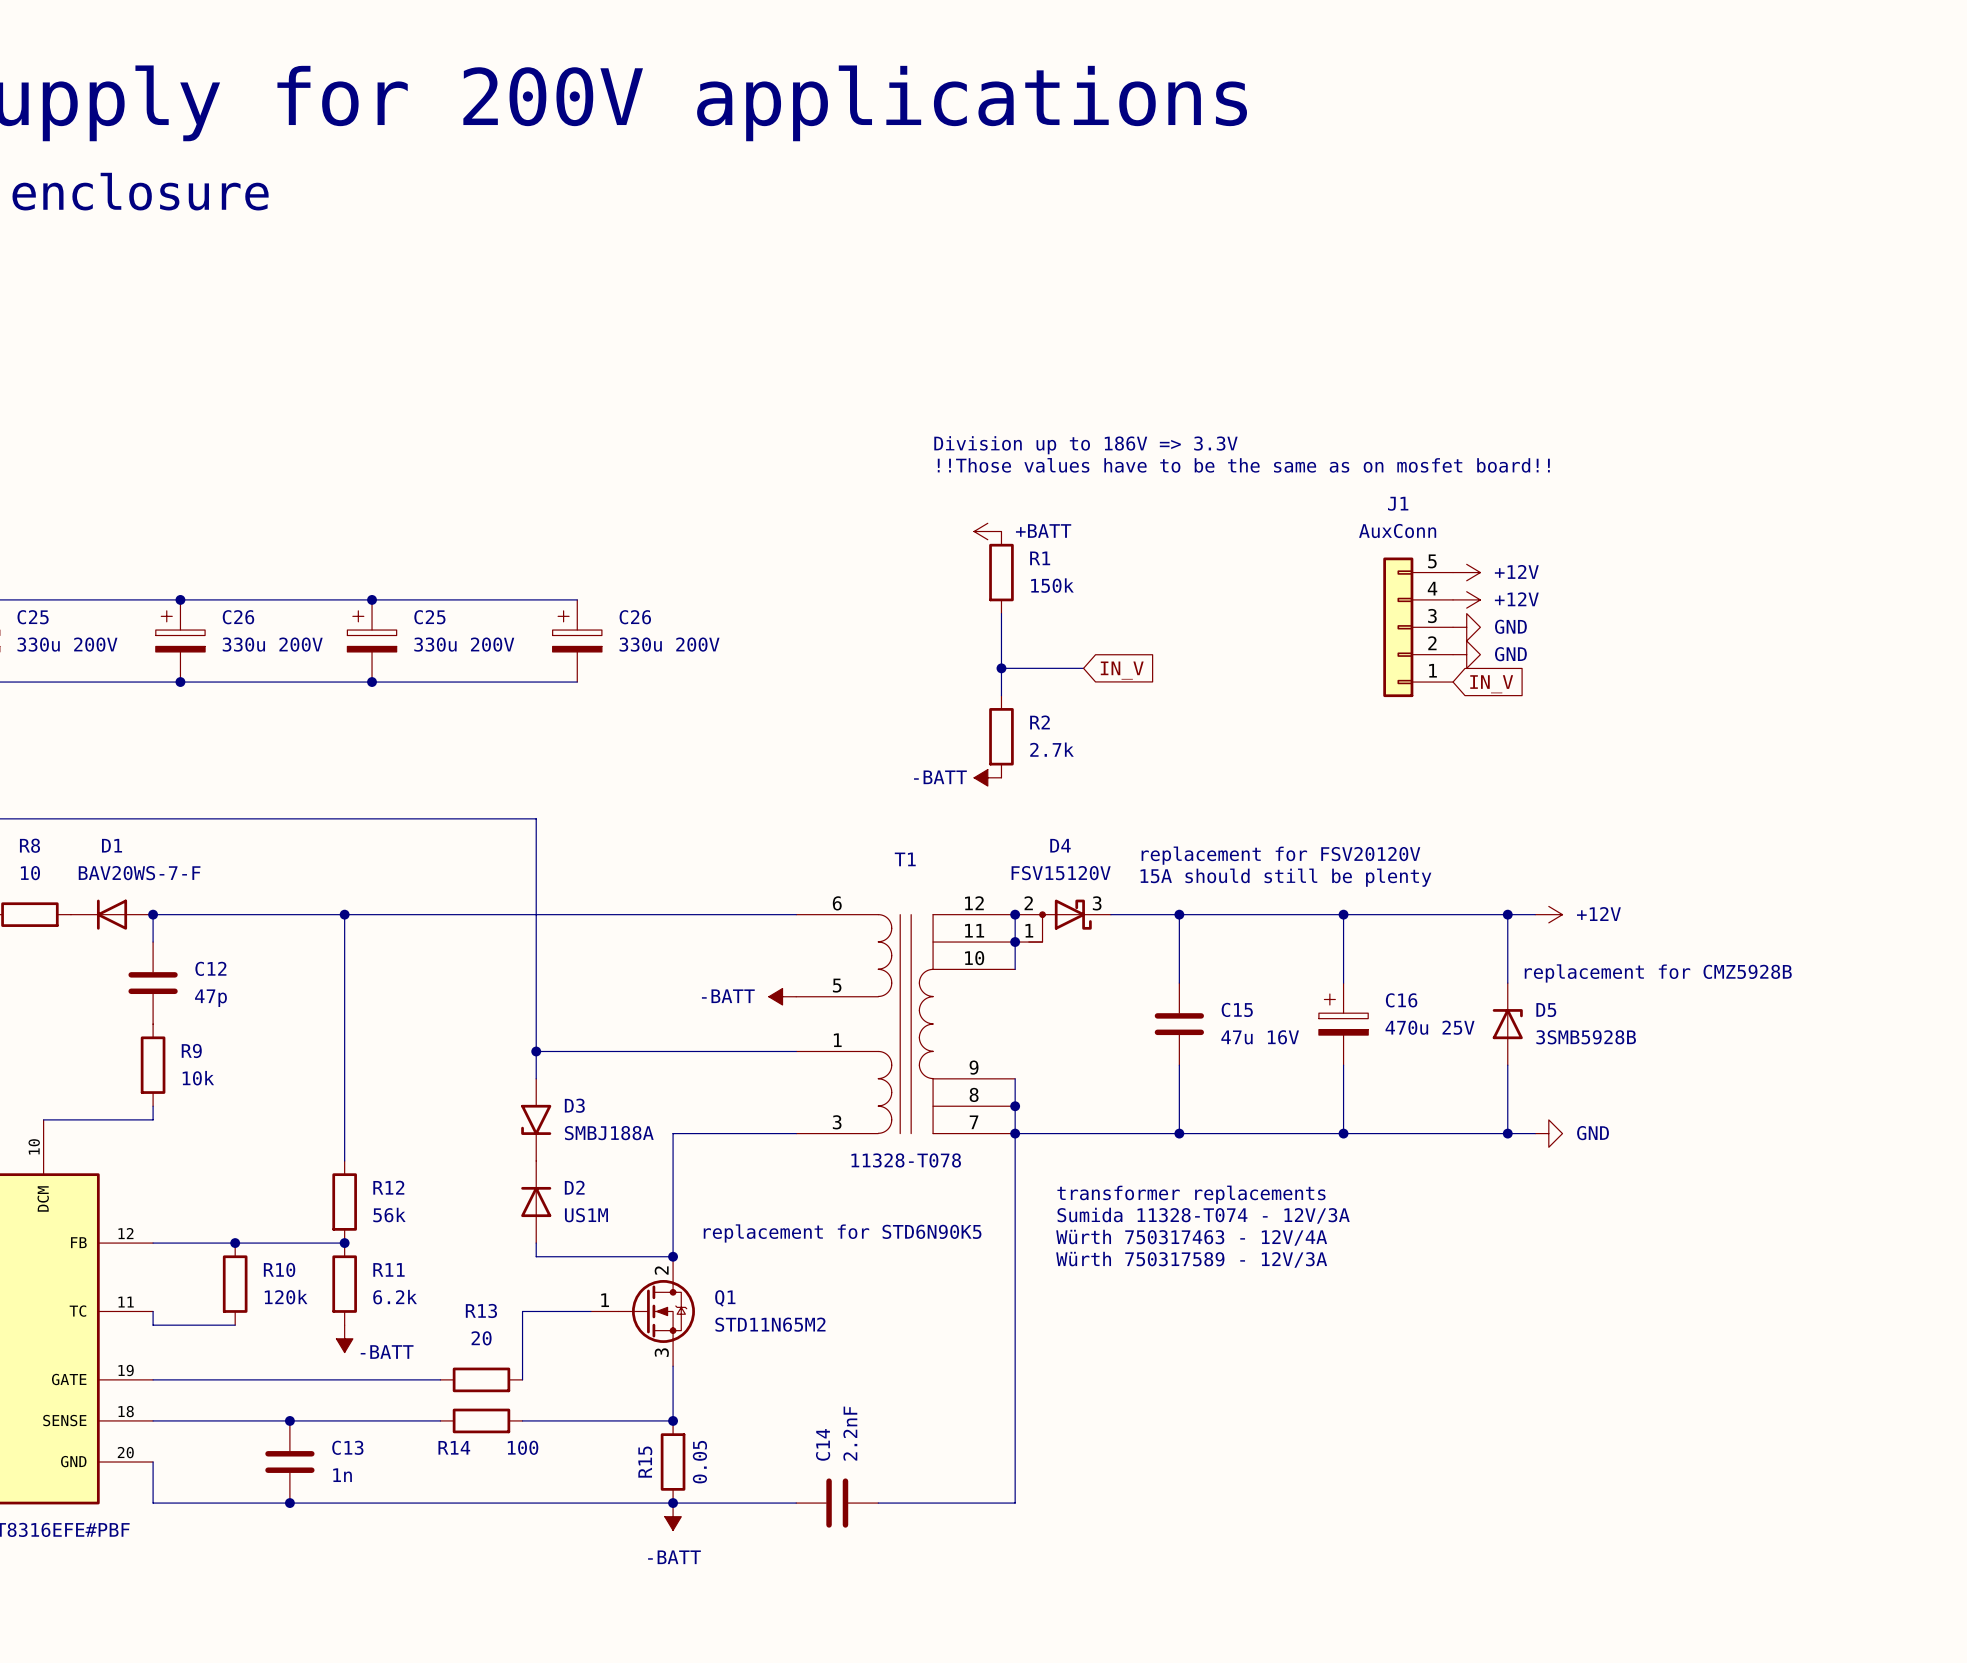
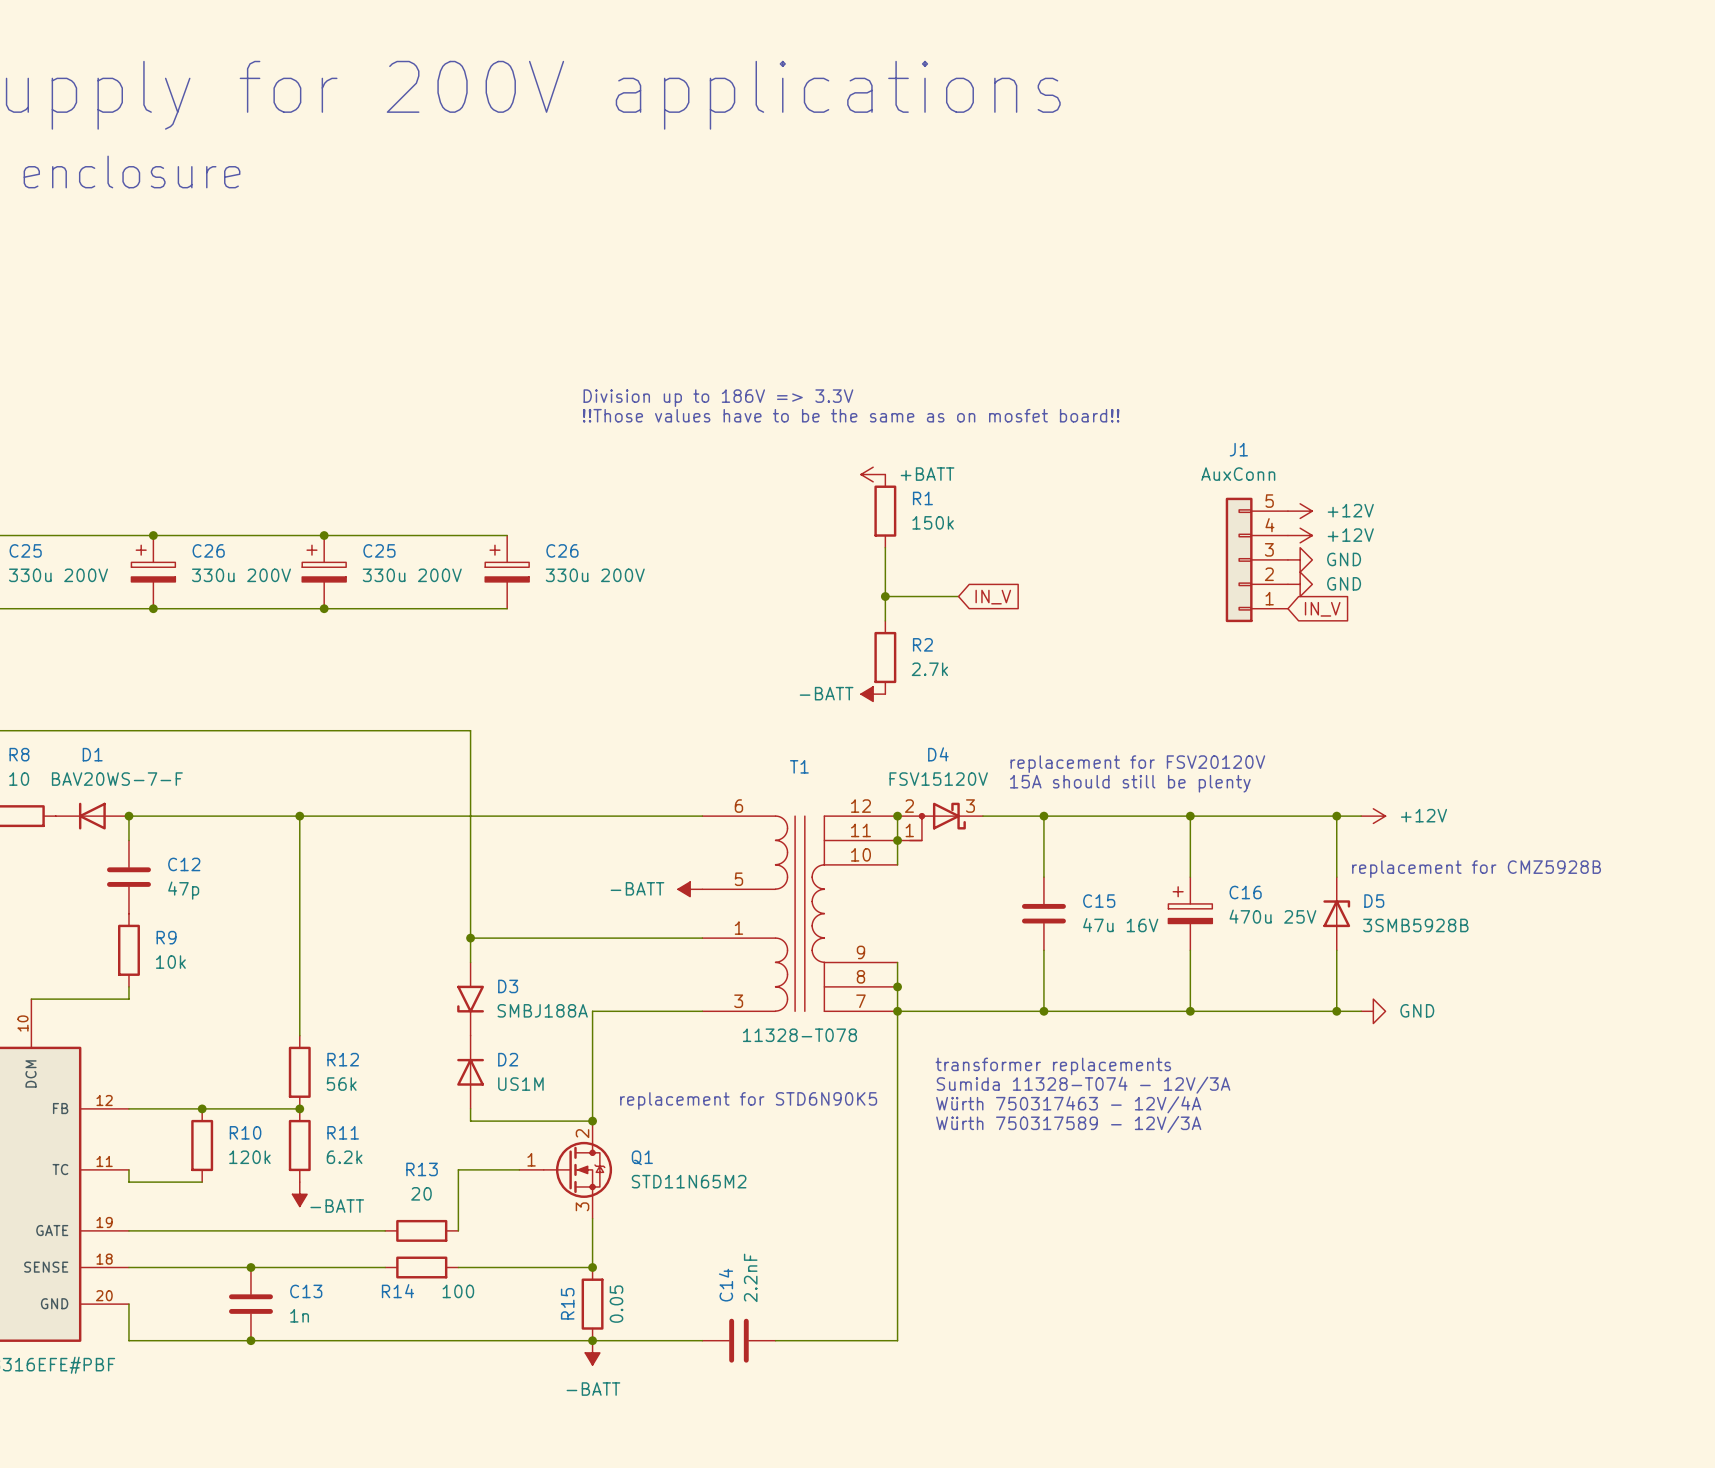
text: none -> Division up to 186V => 3.3V (718, 398)
text: Division up to 186V => 3.3V (1085, 445) -> none
text: none -> !!Those values have to be the same as on mosfet board!! (851, 415)
text: !!Those values have to be the same as on mosfet board!! (1243, 465) -> none

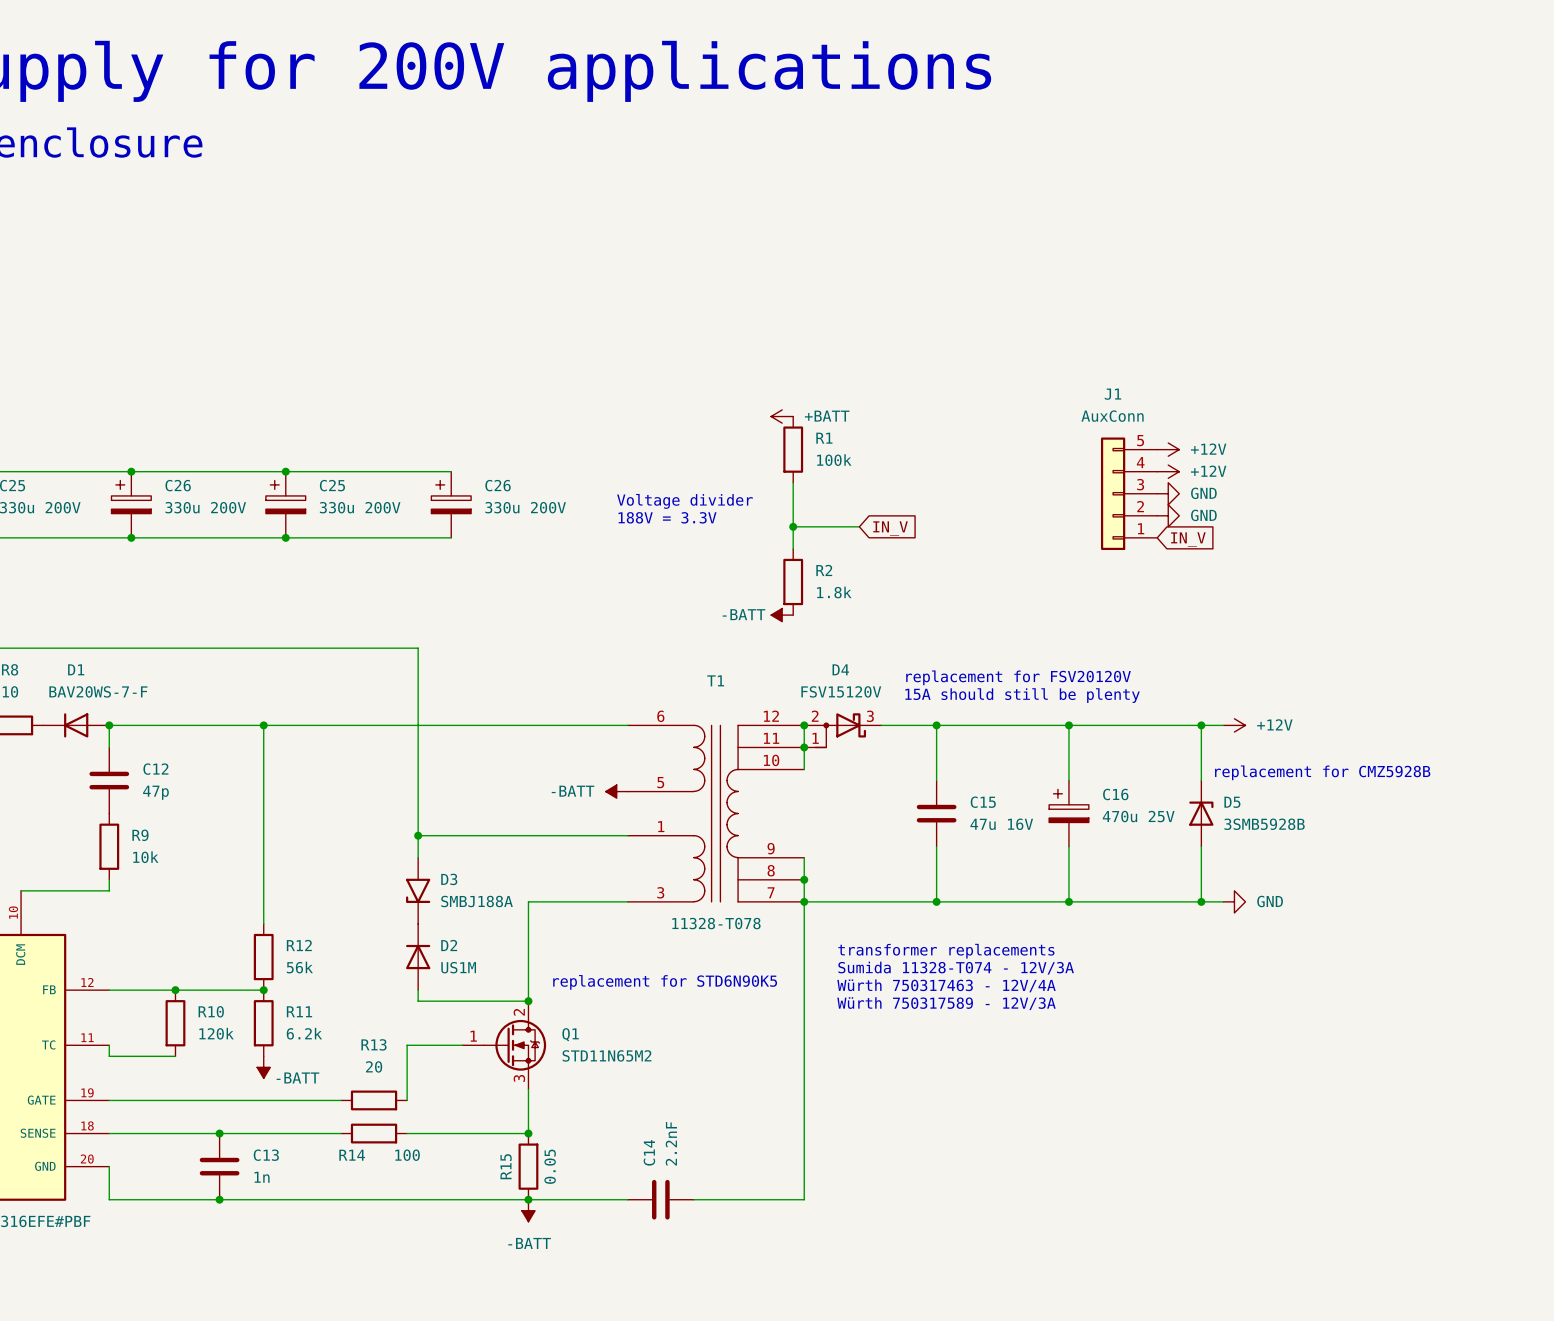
text: Division up to 186V => 3.3V (718, 398) -> none
text: !!Those values have to be the same as on mosfet board!! (851, 415) -> none
R1 value: 150k (933, 522) -> 100k (834, 460)
text: none -> Voltage divider (684, 501)
text: none -> 188V = 3.3V (667, 517)
R2 value: 2.7k (929, 669) -> 1.8k (834, 592)

